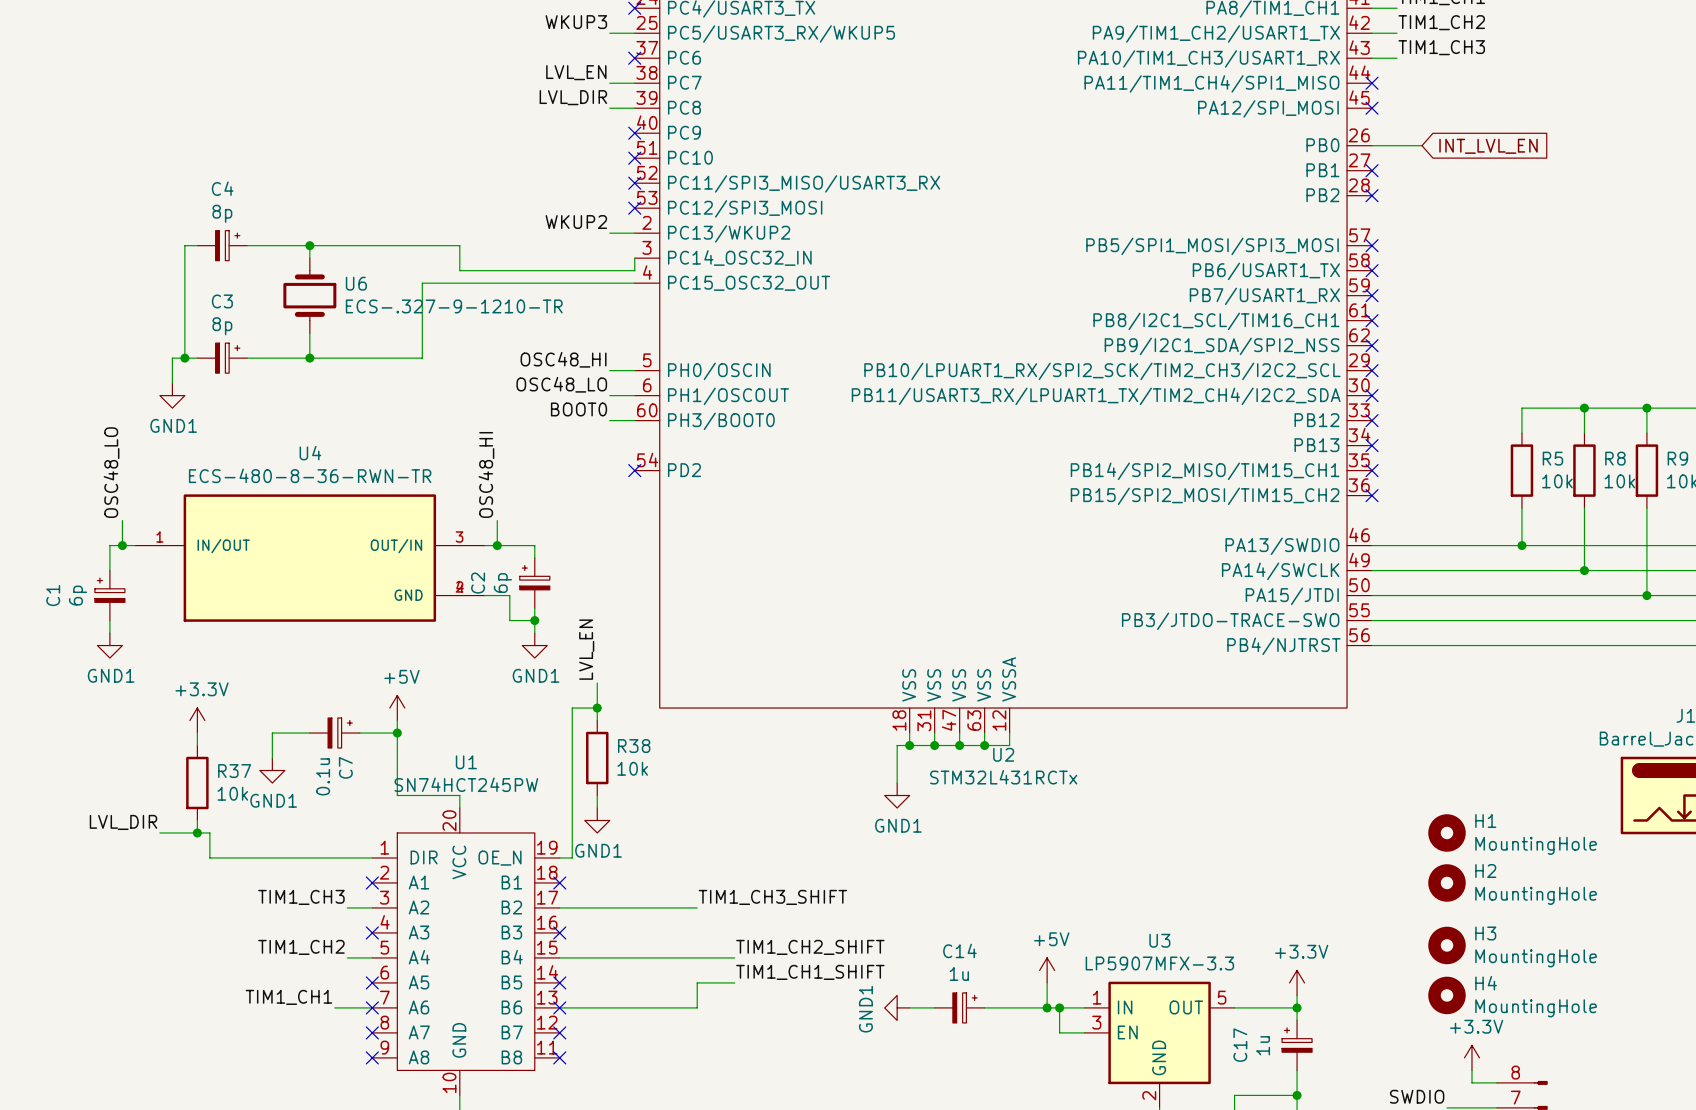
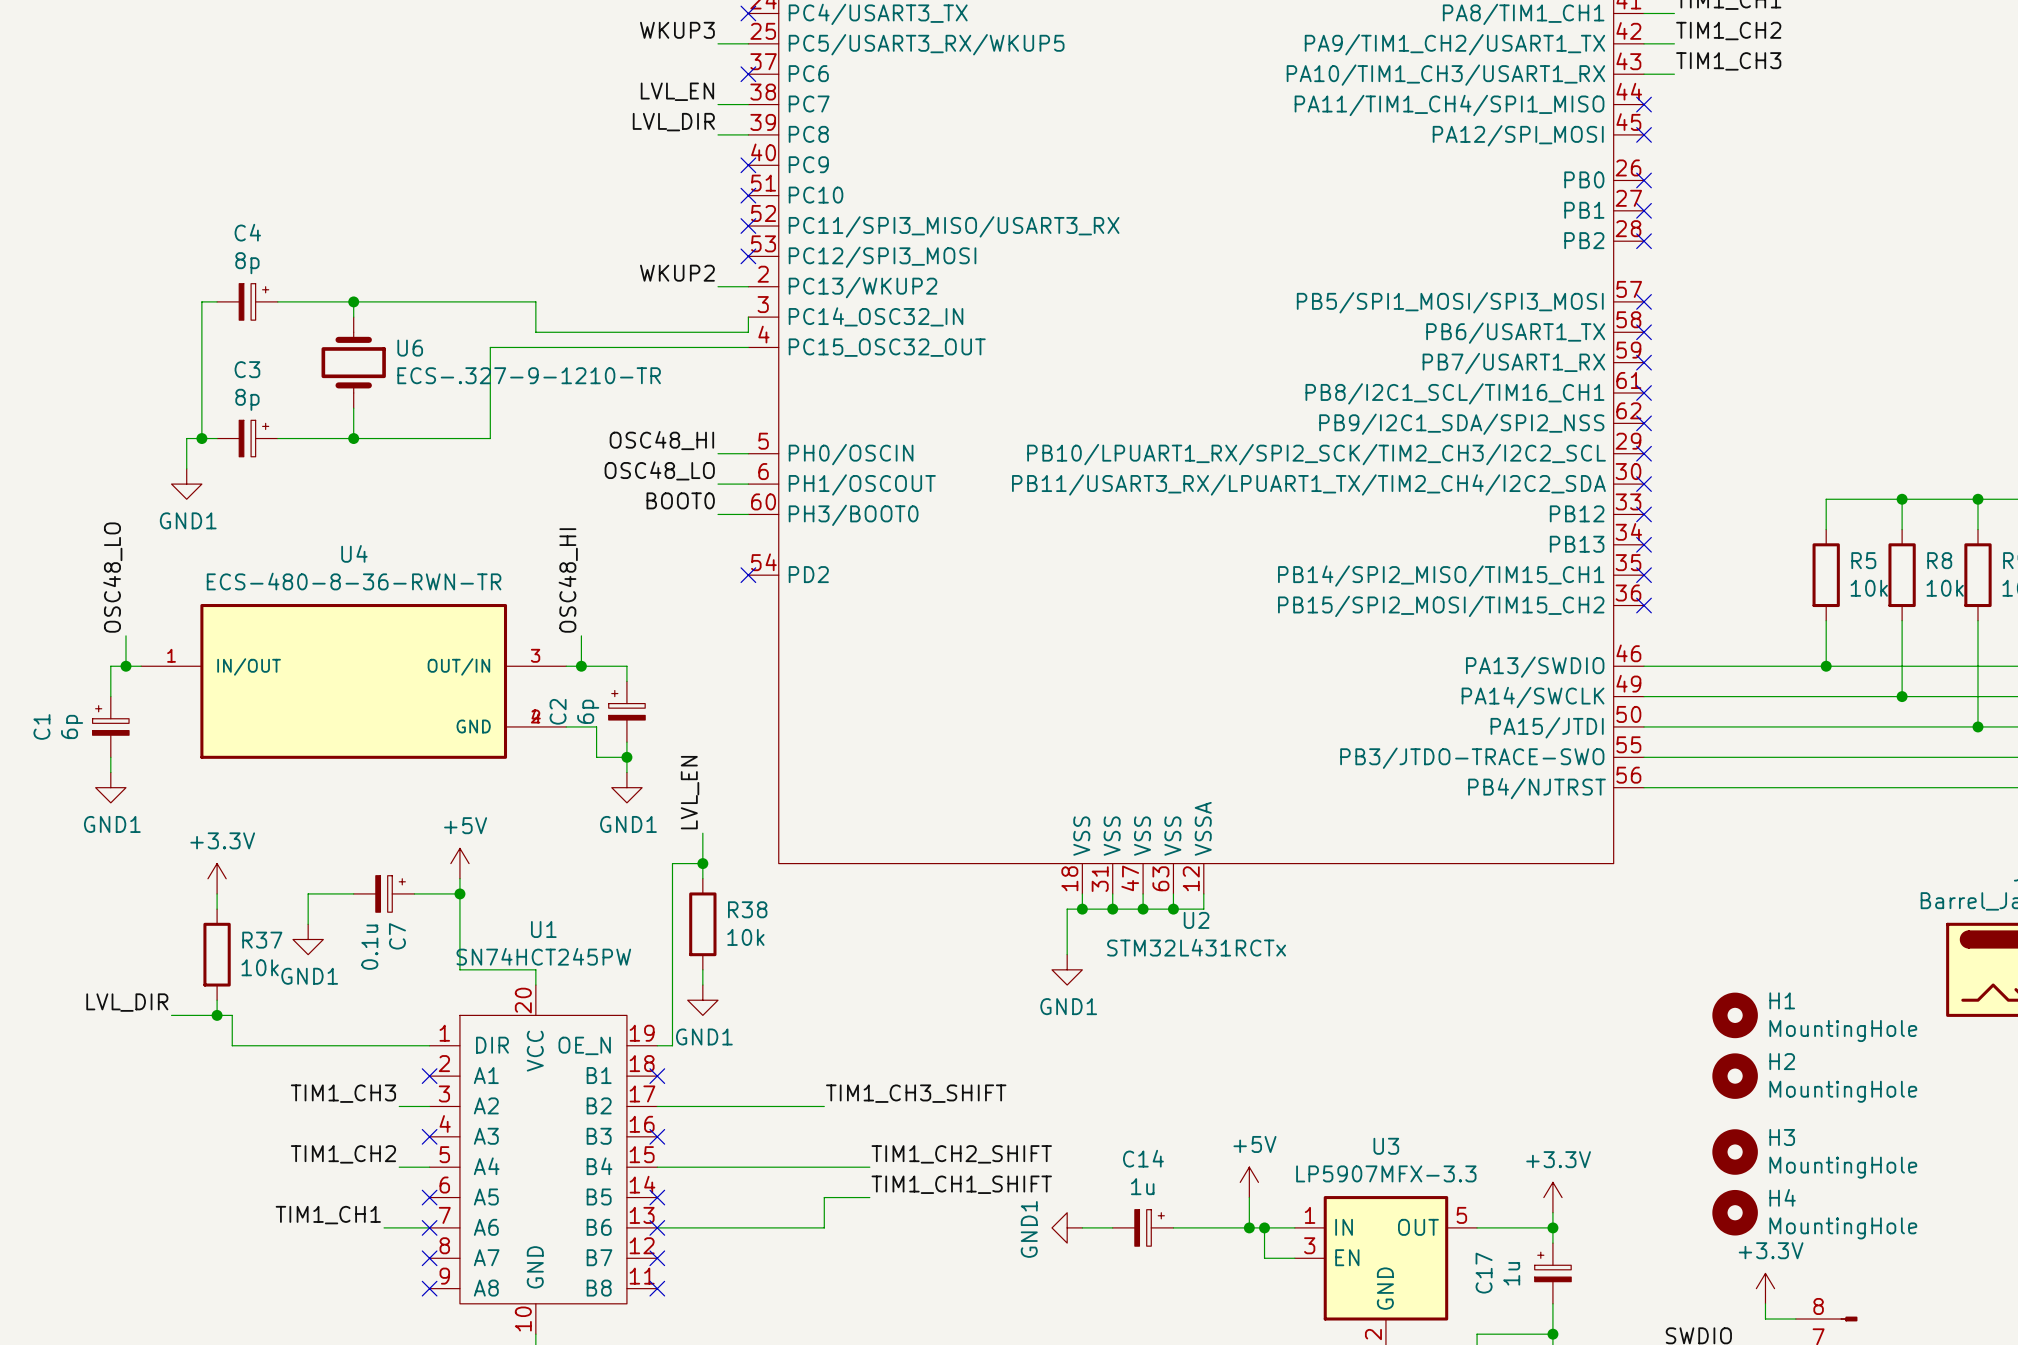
wire: (1372, 145) (1422, 145) -> none
no-connect mark: none -> (1644, 180)
global label: INT_LVL_EN (1488, 146) -> none

